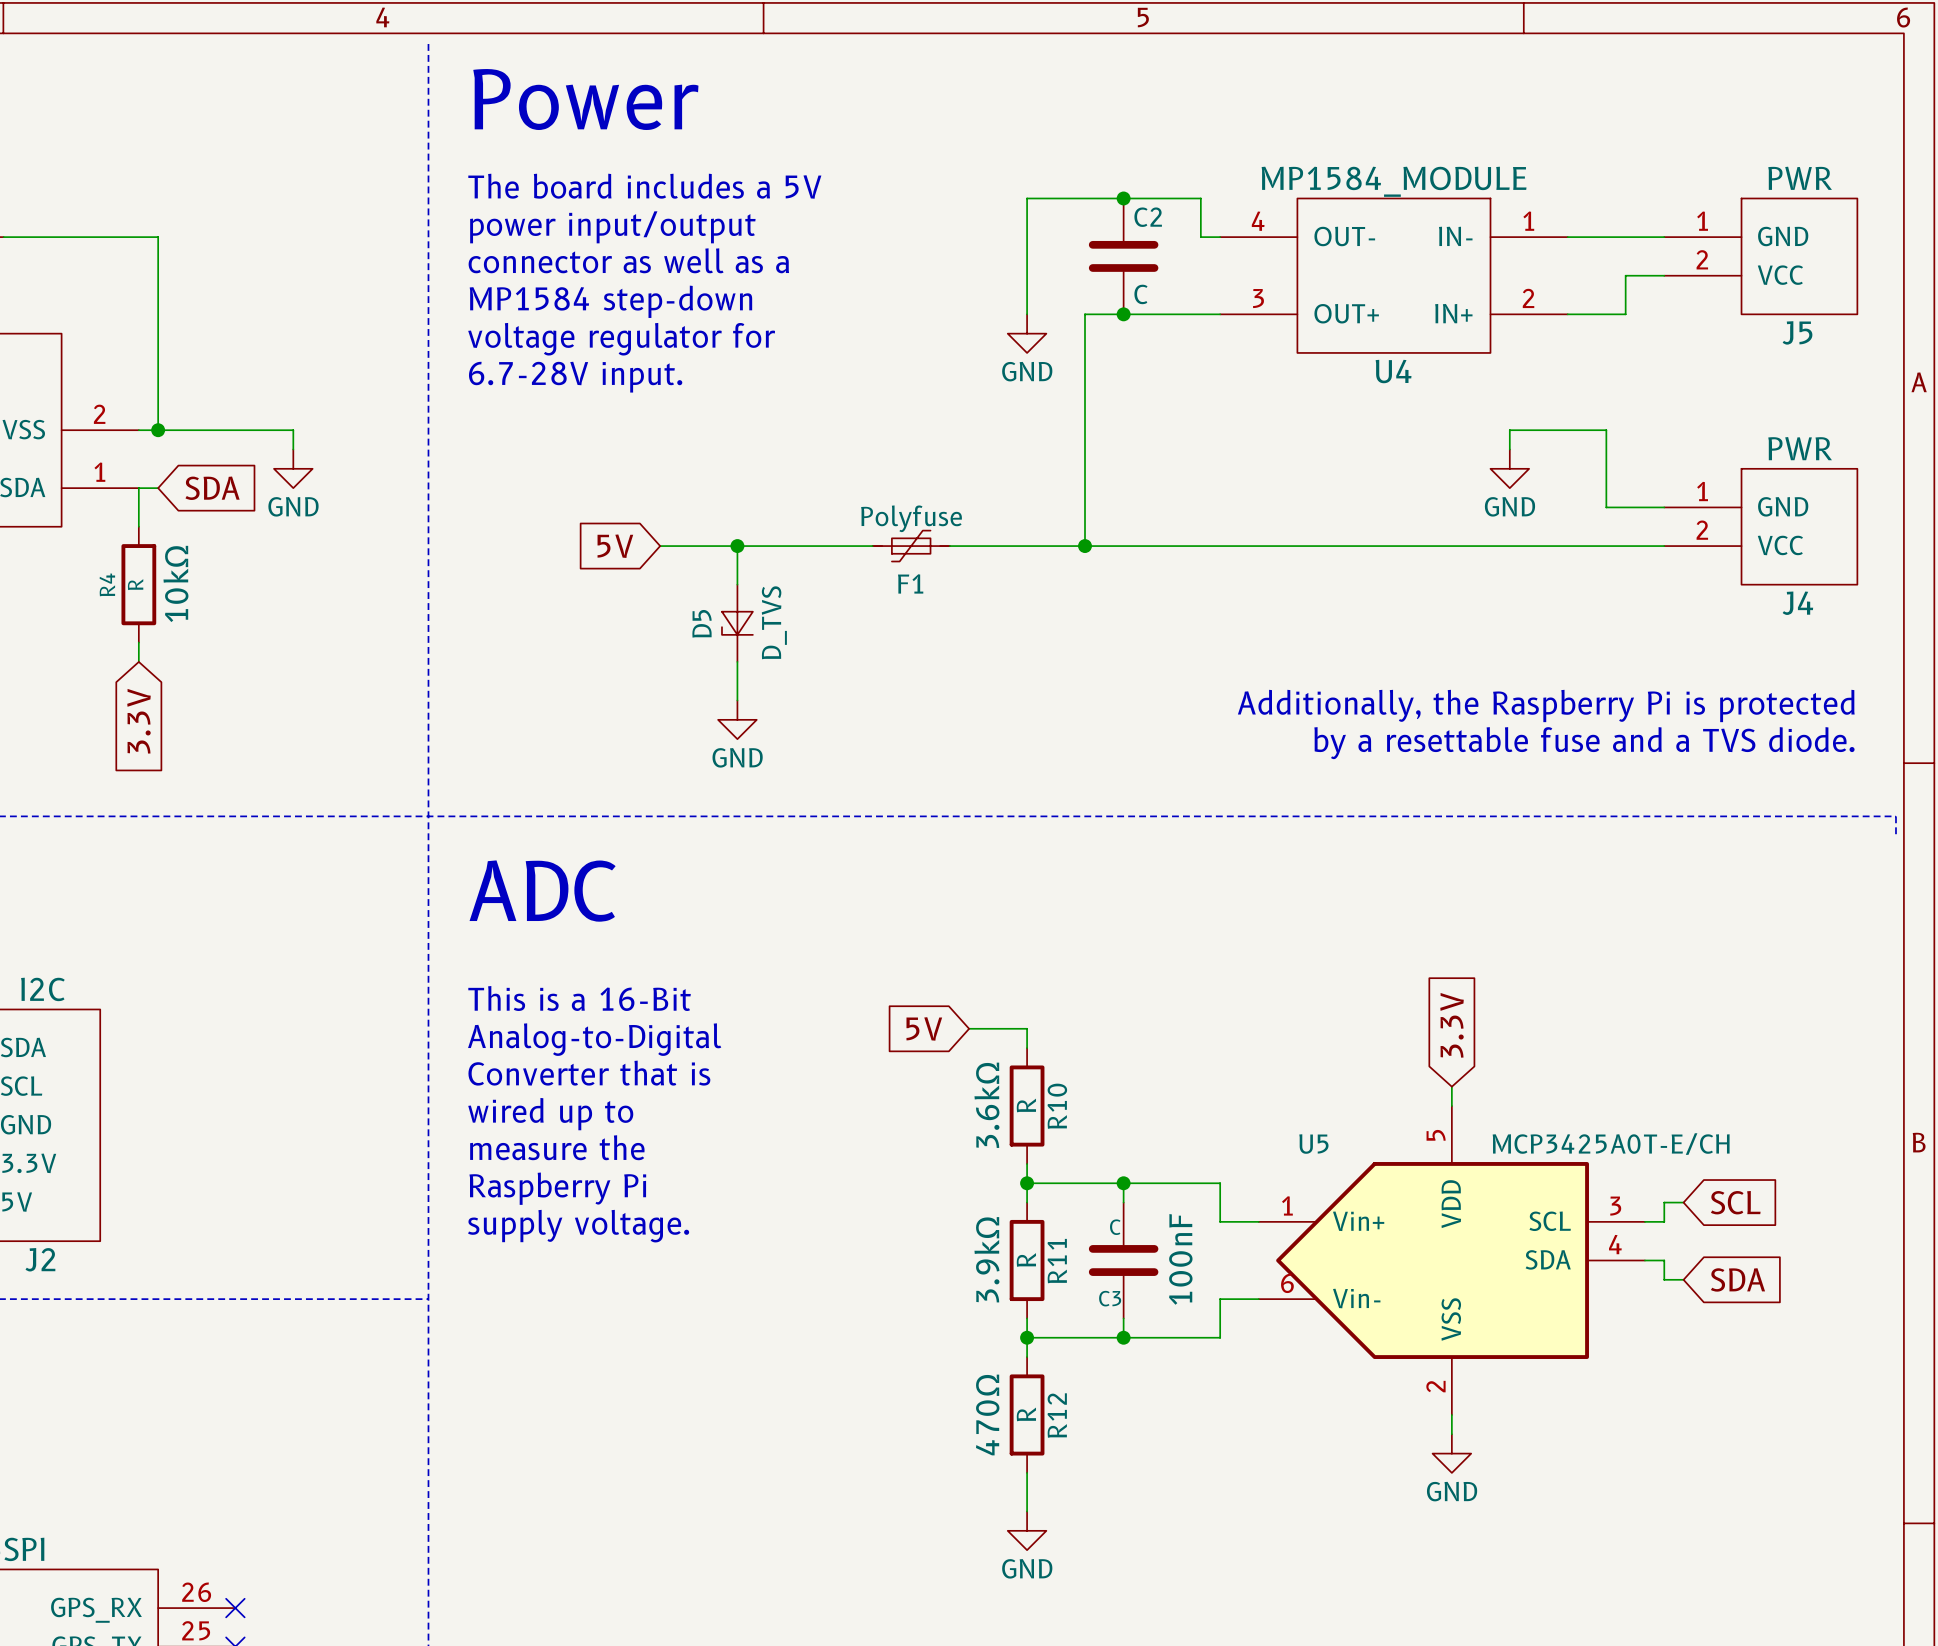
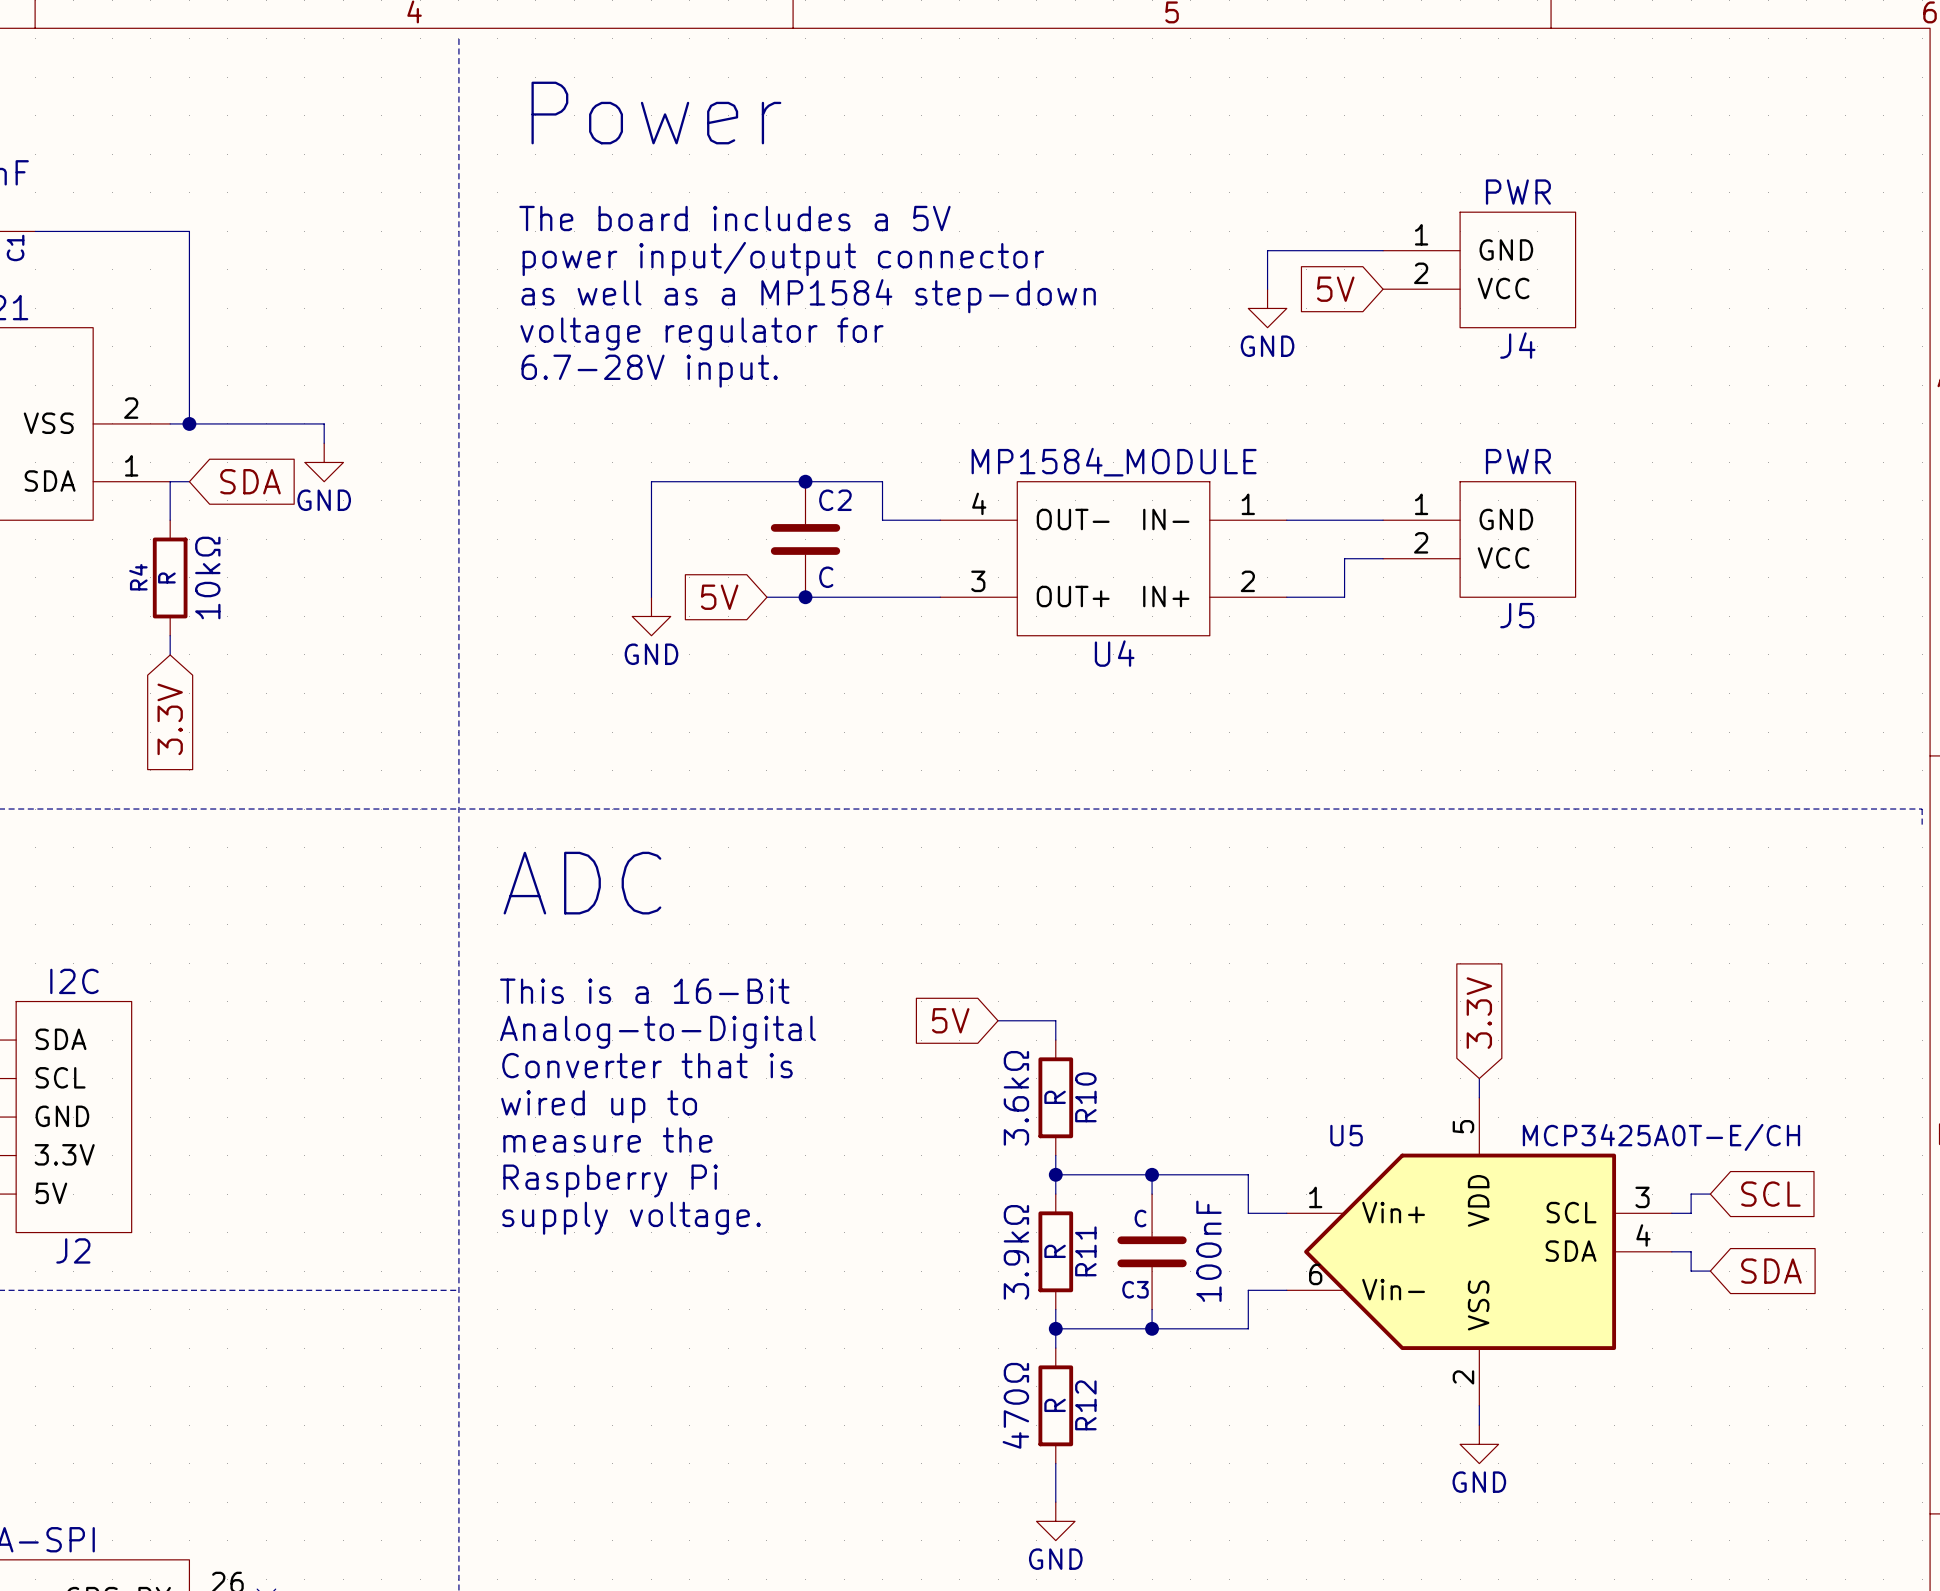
text position: Power (585, 99) -> Power (656, 113)
text position: The board includes a 5V (644, 186) -> The board includes a 5V (734, 218)
junction: (1123, 198) -> none
text: power input/output (612, 227) -> power input/output connector (783, 259)
wire: (1220, 237) (1200, 237) (1200, 198) (1027, 198) (1027, 314) -> none
wire: (1567, 237) (1664, 237) -> none
C2 position: (1123, 256) -> (805, 539)
wire: none -> (1383, 250) (1267, 250) (1267, 289)
J5 position: (1760, 256) -> (1479, 539)
text: connector as well as a (628, 260) -> none
U4 position: (1393, 275) -> (1113, 558)
wire: (1664, 275) (1625, 275) (1625, 314) (1567, 314) -> none
global label: none -> 5V (1335, 289)
text: MP1584 step-down (610, 301) -> as well as a MP1584 step-down (808, 296)
junction: (1123, 314) -> none
wire: (1220, 314) (1085, 314) (1085, 546) -> none
power symbol: none -> GND (1267, 308)
power symbol: GND (1027, 333) -> none
text position: voltage regulator for (621, 339) -> voltage regulator for (701, 333)
text position: 6.7-28V input. (575, 377) -> 6.7-28V input. (649, 371)
wire: (1509, 449) (1509, 430) (1606, 430) (1606, 507) (1664, 507) -> none
power symbol: GND (1509, 468) -> none
junction: none -> (805, 481)
wire: none -> (940, 520) (882, 520) (882, 481) (651, 481) (651, 597)
wire: none -> (1286, 520) (1383, 520)
J4 position: (1760, 526) -> (1479, 269)
global label position: 5V (615, 546) -> 5V (719, 597)
wire: (660, 546) (872, 546) -> none
wire: (737, 546) (737, 584) -> none
junction: (737, 546) -> none
F1: Polyfuse (911, 546) -> none
wire: (949, 546) (1664, 546) -> none
junction: (1085, 546) -> none
wire: none -> (1383, 558) (1344, 558) (1344, 597) (1286, 597)
wire: none -> (766, 597) (940, 597)
junction: none -> (805, 597)
D5: D_TVS (737, 623) -> none
wire: (737, 661) (737, 700) -> none
text: Additionally, the Raspberry Pi is protected (1546, 705) -> none
power symbol position: GND (737, 719) -> GND (651, 616)
text: by a resettable fuse and a TVS diode. (1584, 743) -> none

